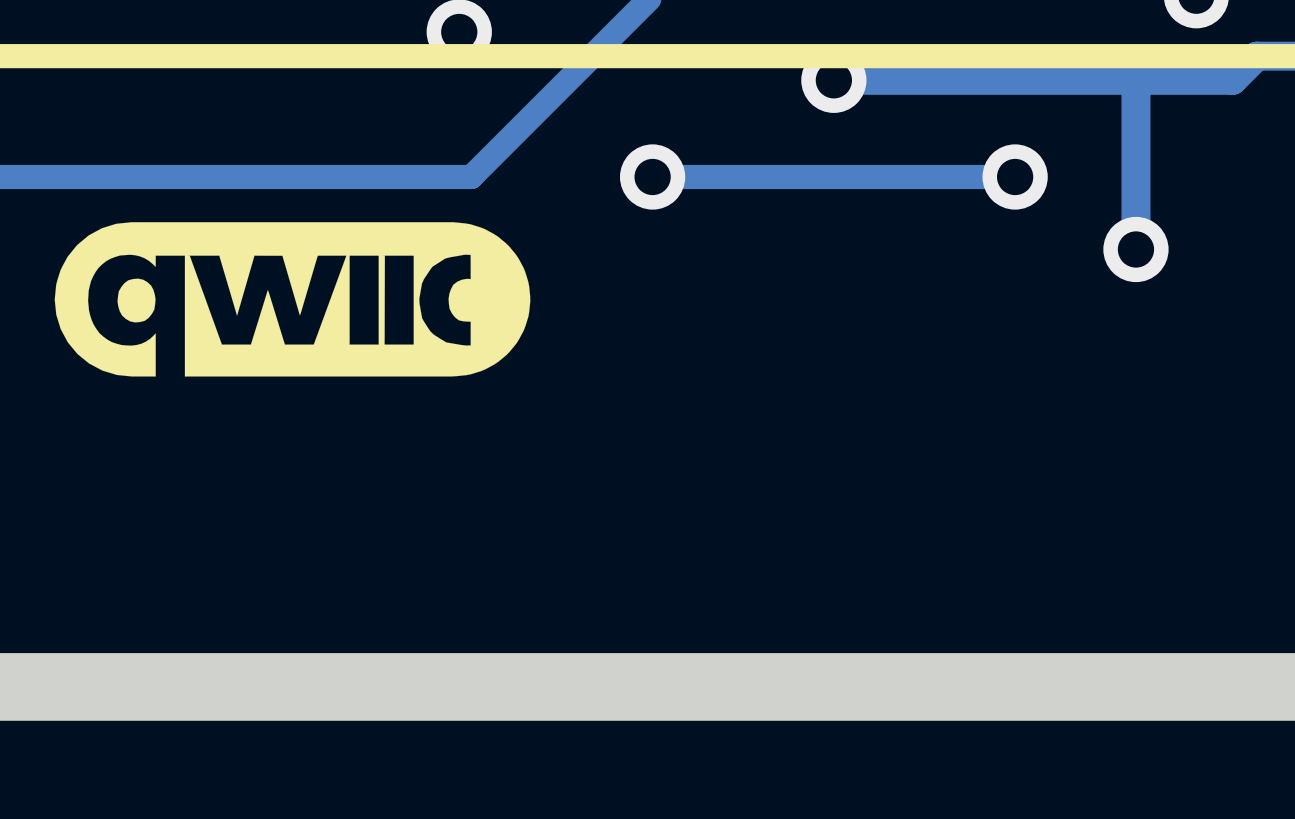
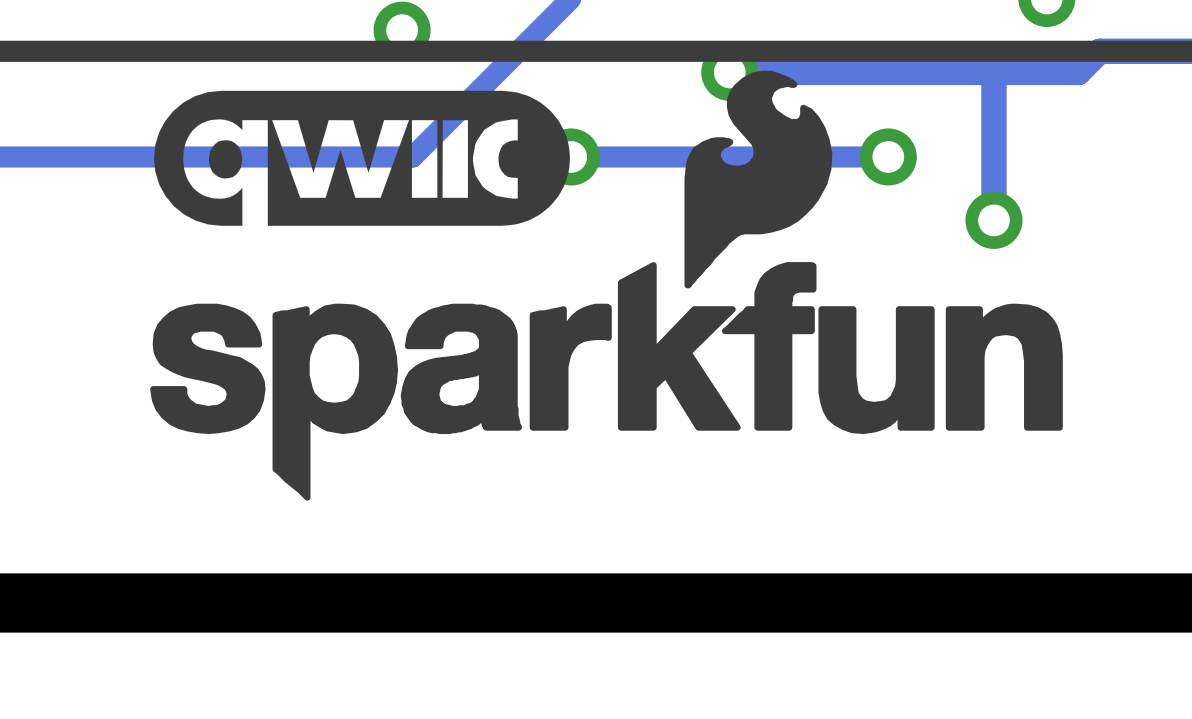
drawing: none -> [150, 70, 1063, 501]
drawing position: (292, 299) -> (361, 158)

